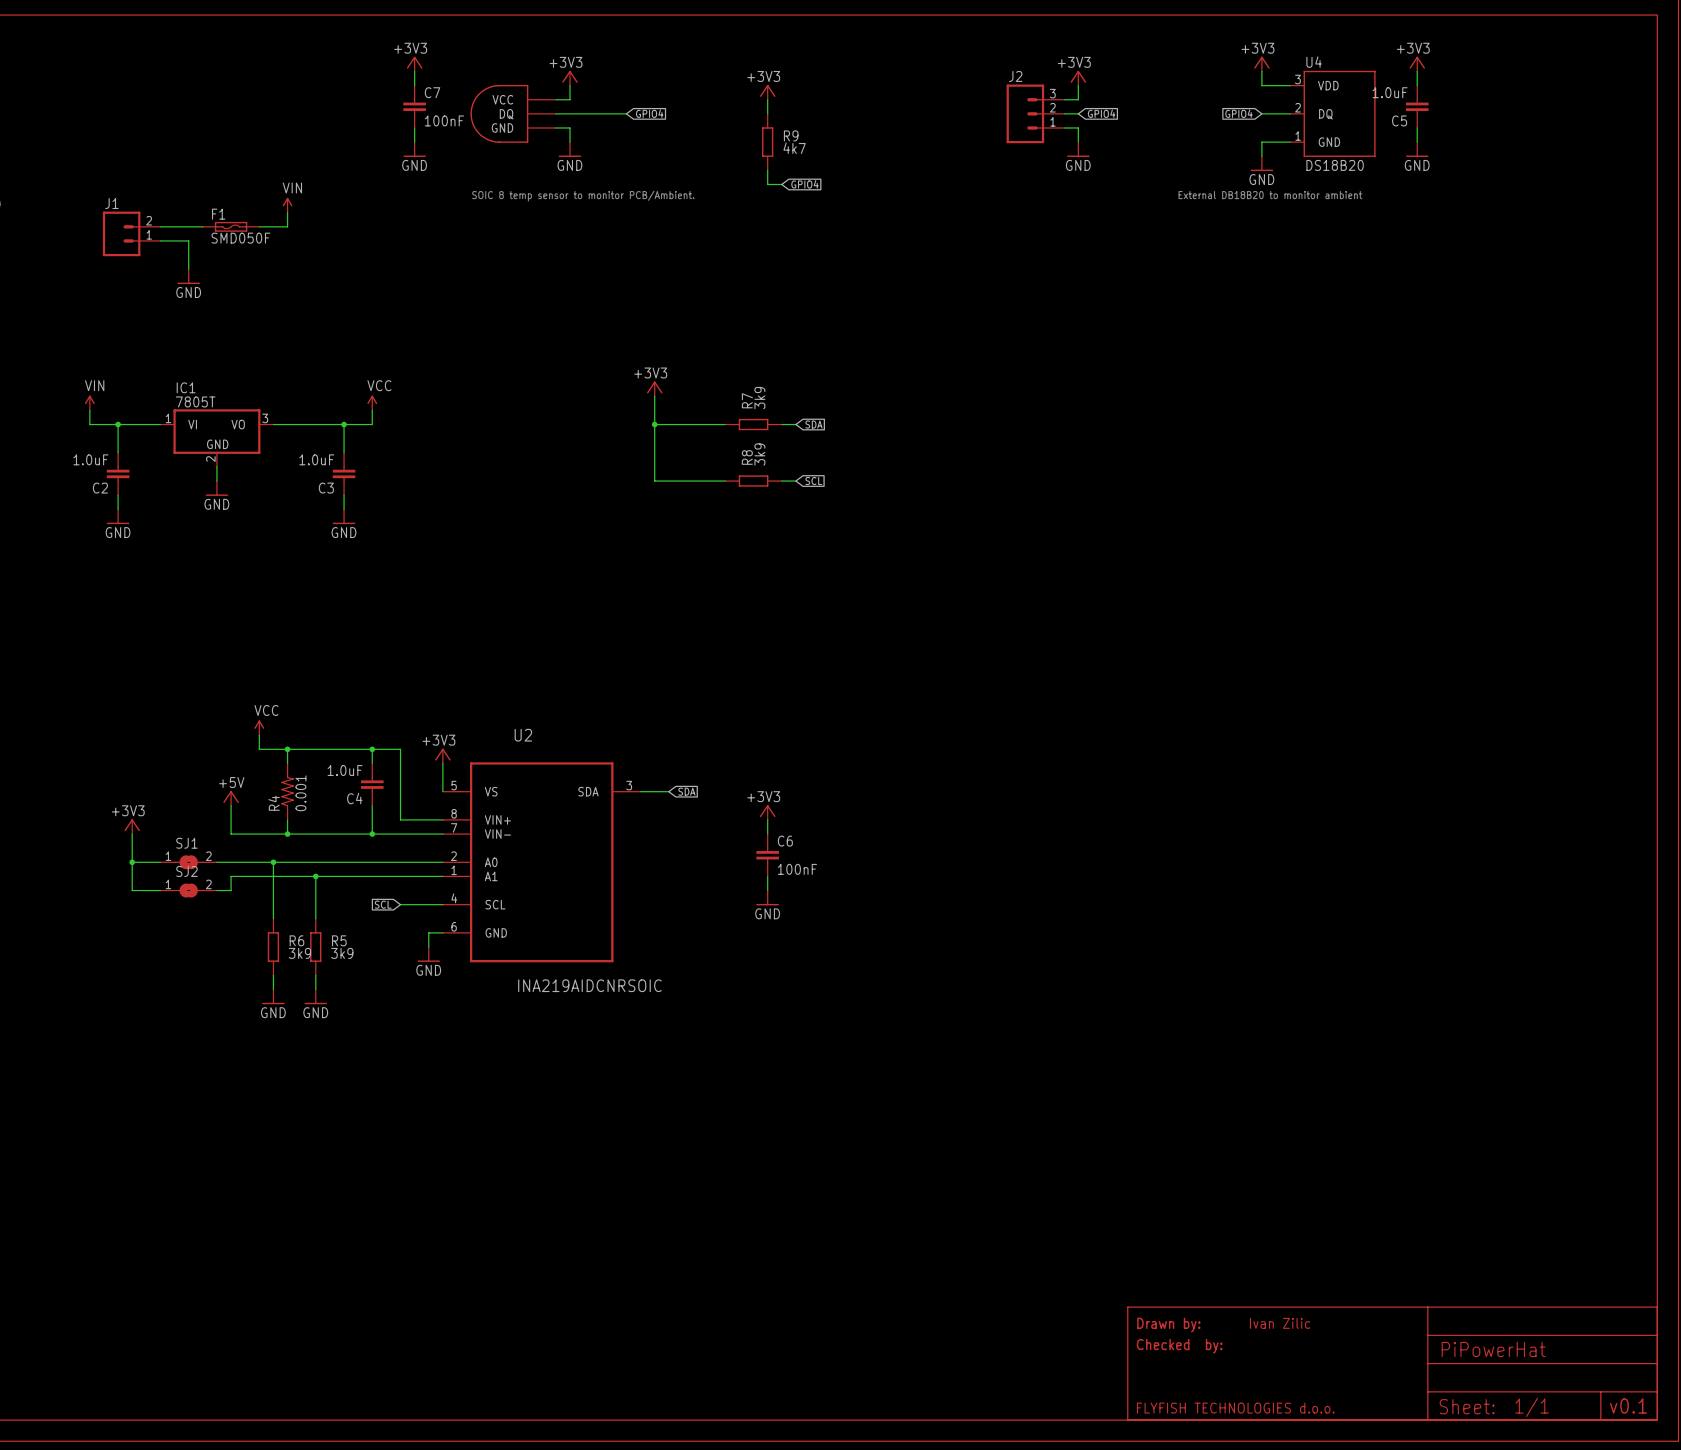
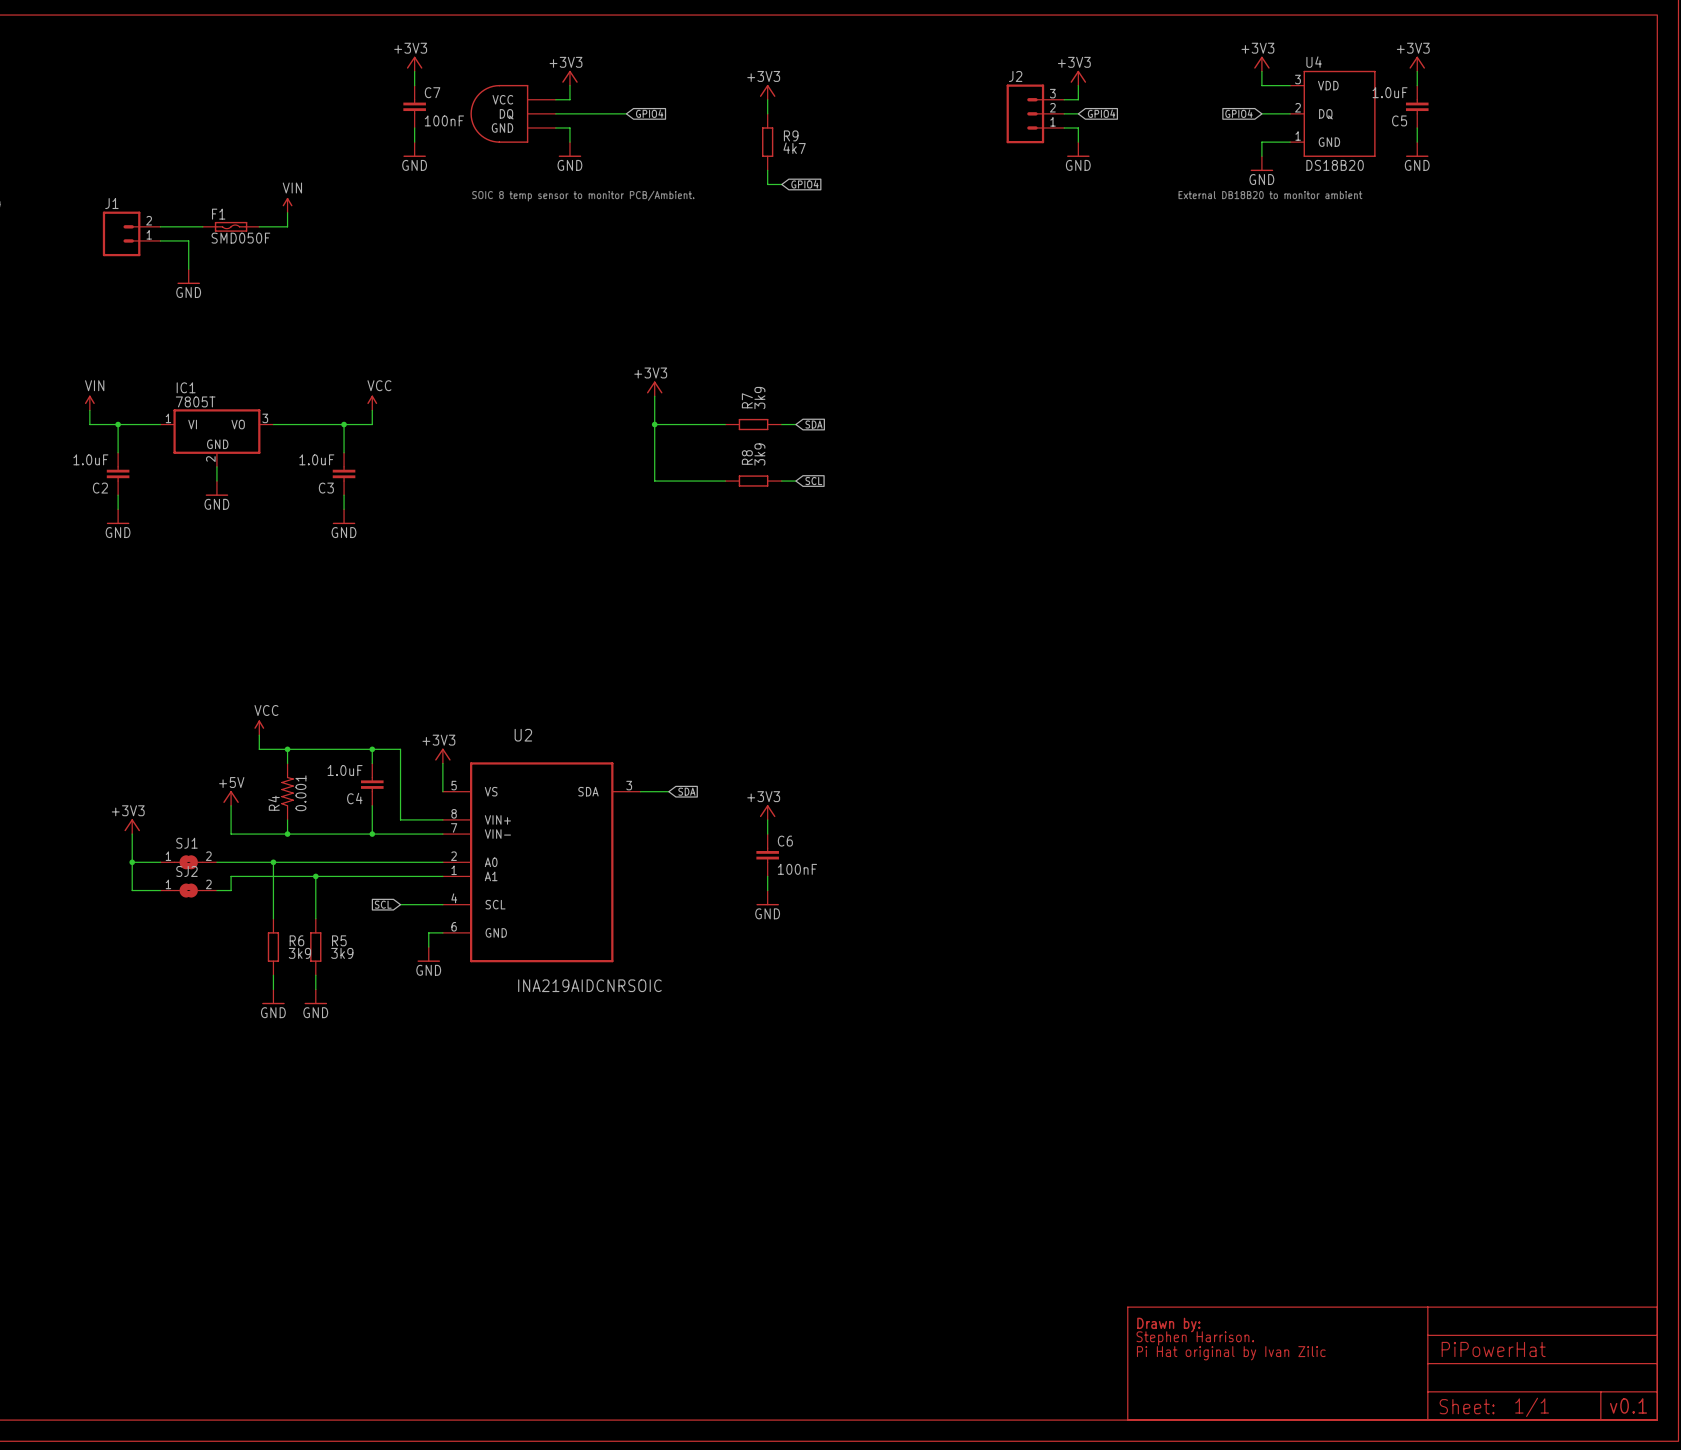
text: Ivan Zilic (1280, 1323) -> none
text: none -> Stephen Harrison. (1195, 1338)
text: Checked by: (1179, 1346) -> none
text: none -> Pi Hat original by Ivan Zilic (1231, 1353)
text: FLYFISH TECHNOLOGIES d.o.o. (1235, 1408) -> none

